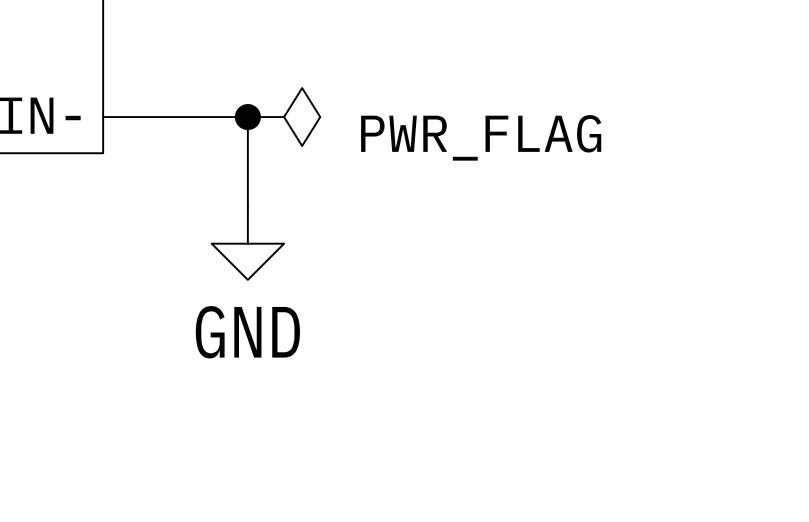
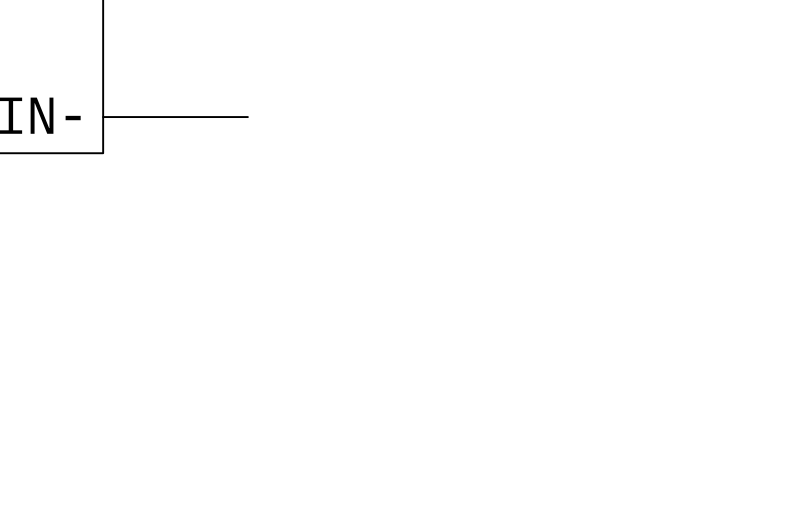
wire: (247, 117) (247, 207) -> none
junction: (247, 117) -> none
power symbol: PWR_FLAG (284, 117) -> none
power symbol: GND (247, 243) -> none

